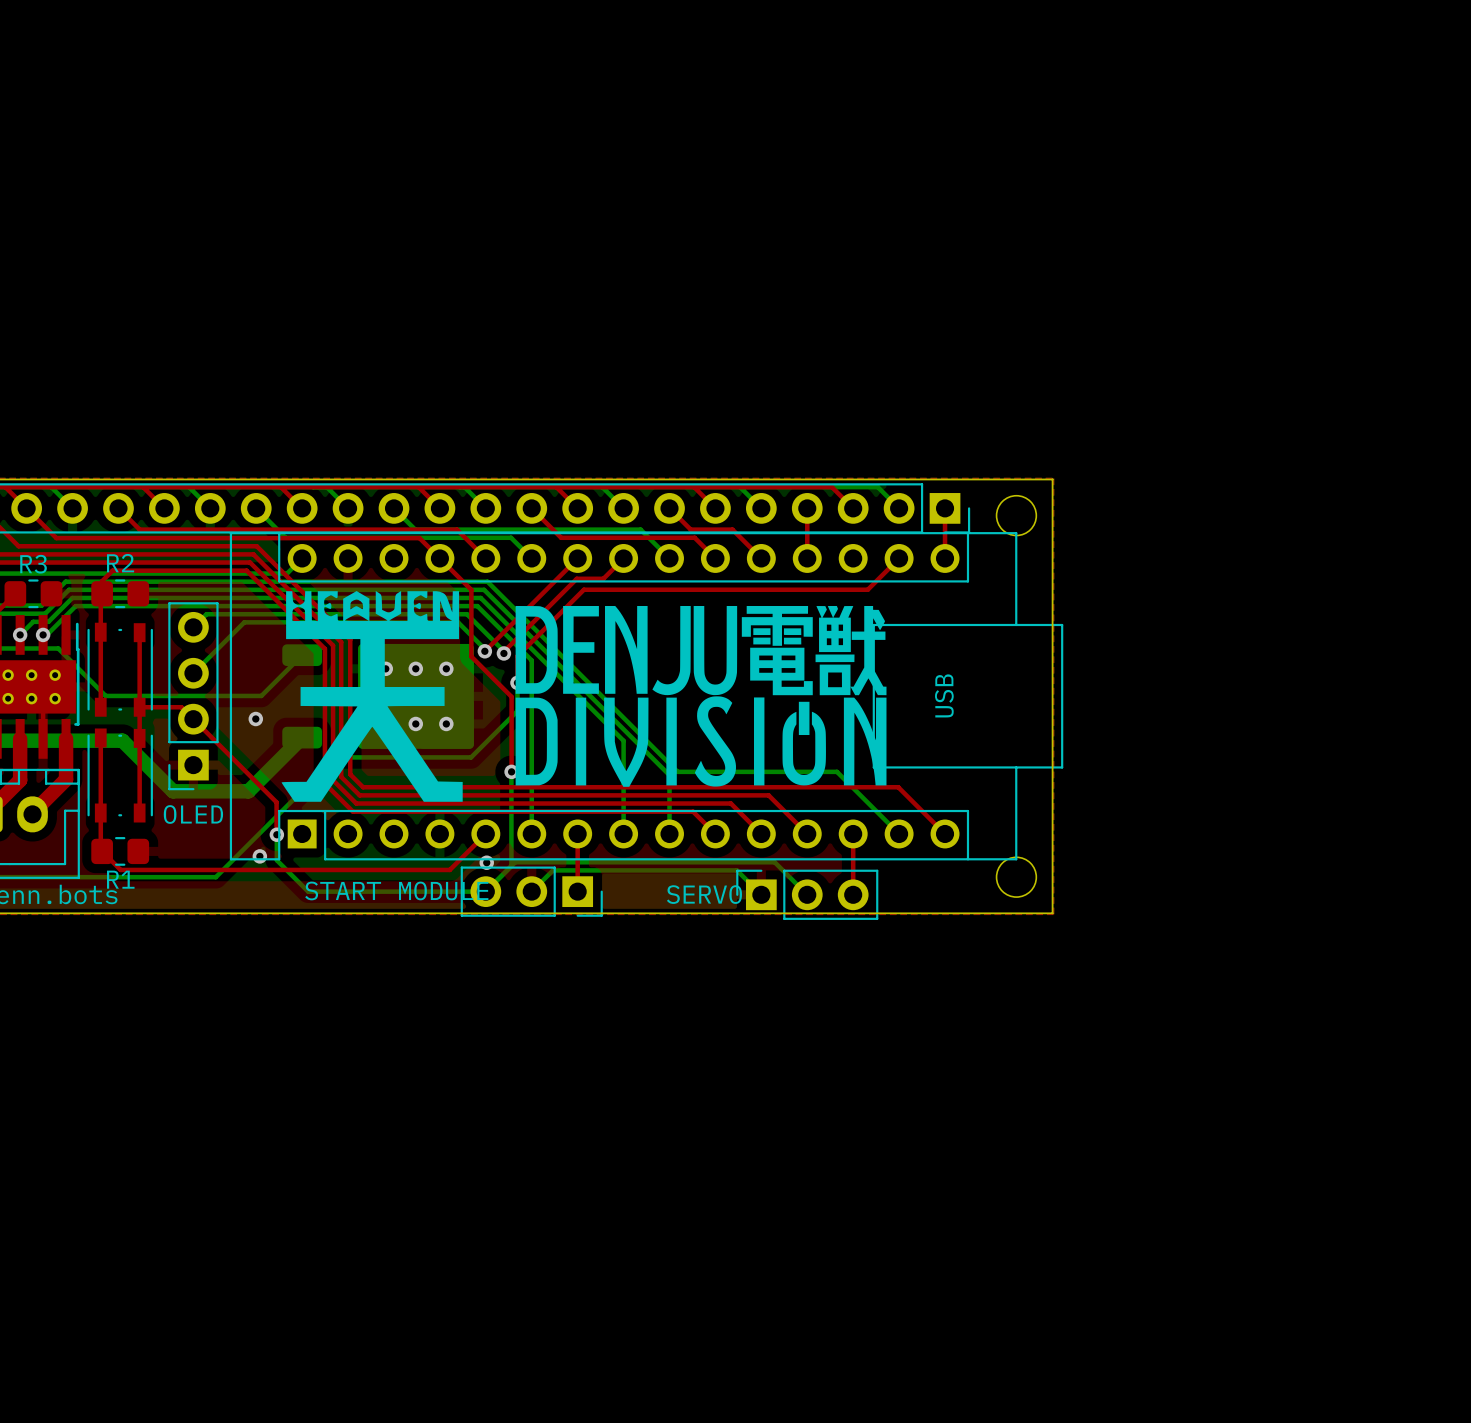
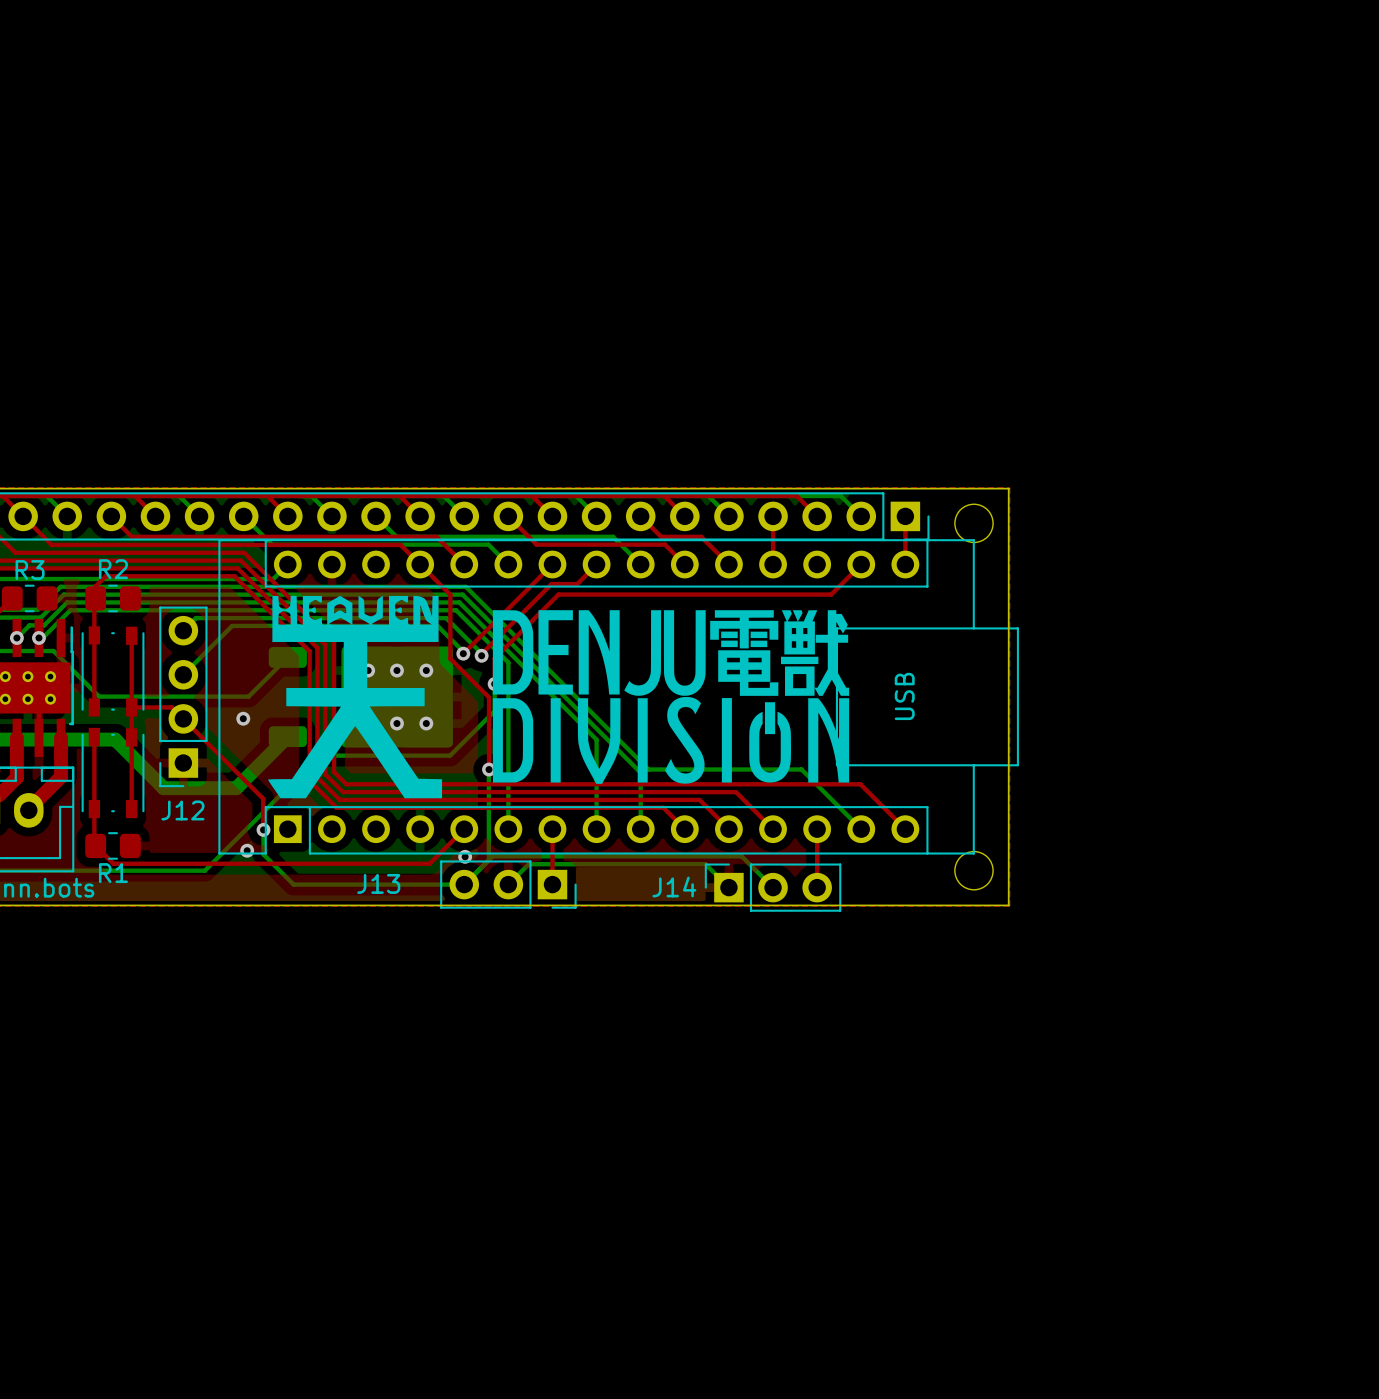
OLED name: OLED (193, 814) -> J12 (182, 810)
START MODULE name: START MODULE (396, 890) -> J13 (378, 883)
SERVO name: SERVO (704, 894) -> J14 (674, 887)

